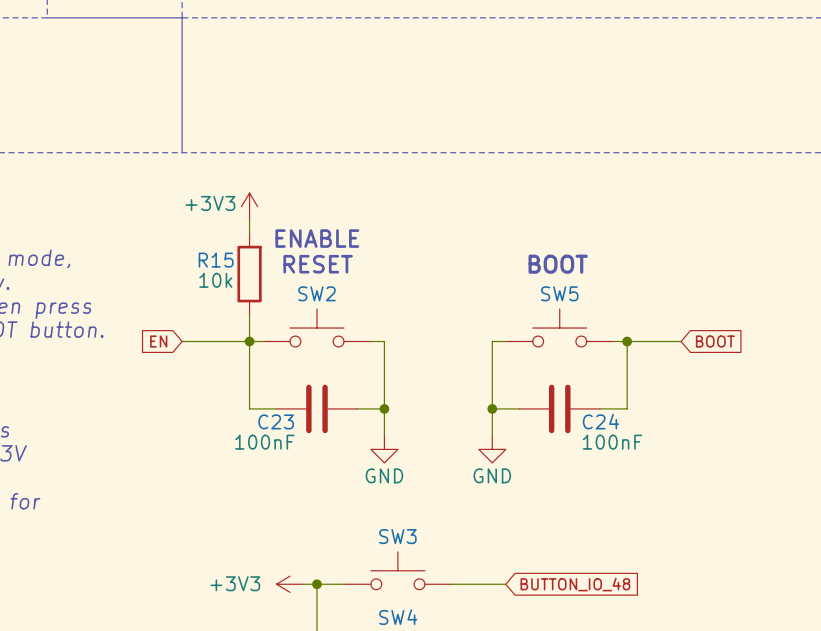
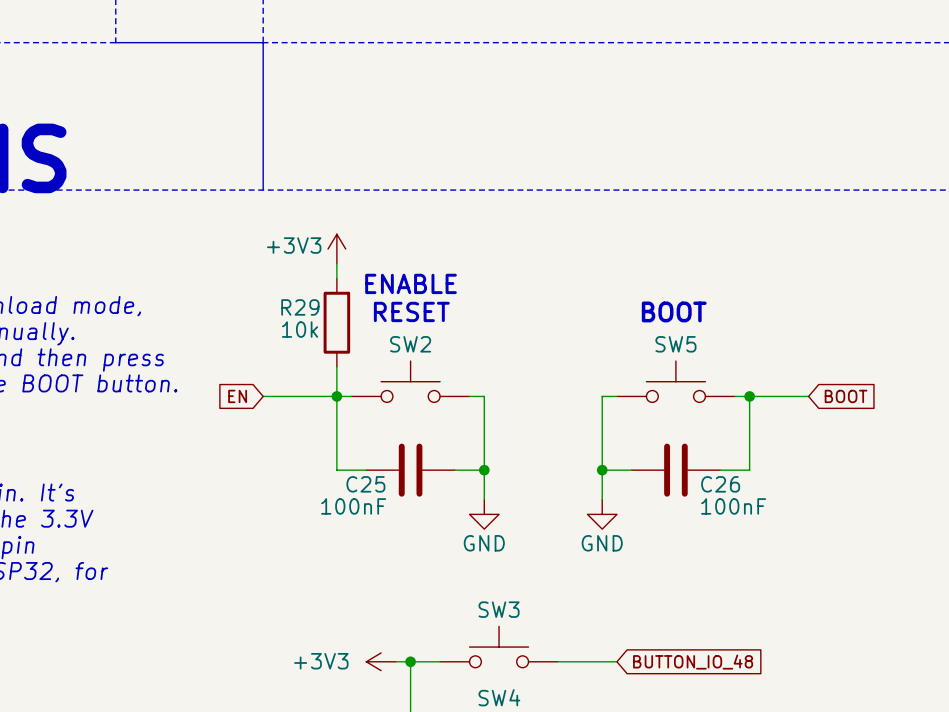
R15 name: R15 (216, 260) -> R29 (300, 307)
C23 name: C23 (276, 421) -> C25 (365, 484)
C24 name: C24 (600, 421) -> C26 (720, 484)

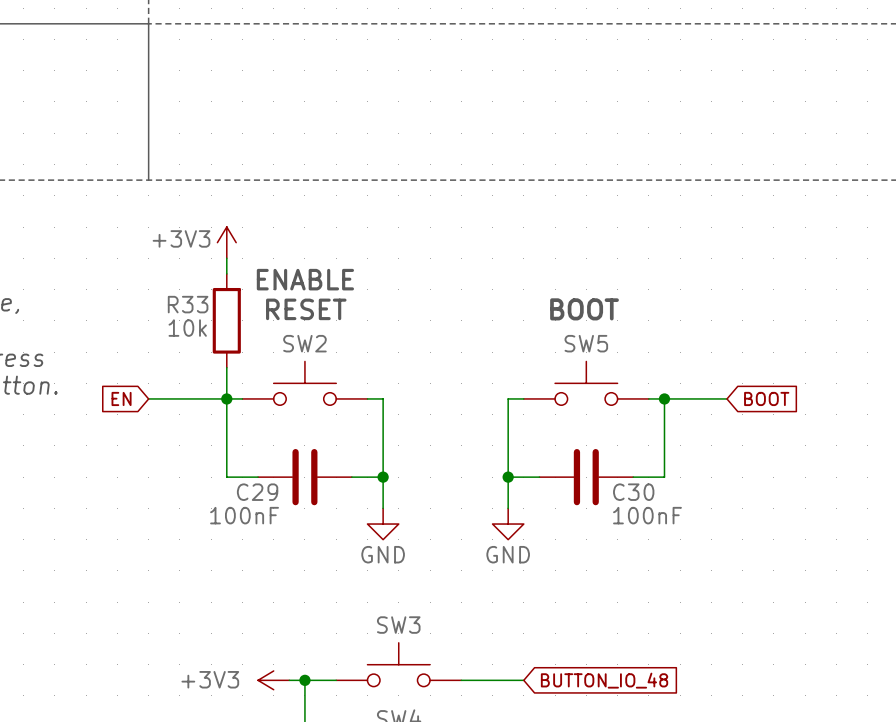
R29 name: R29 (300, 307) -> R33 (188, 304)
C25 name: C25 (365, 484) -> C29 (257, 492)
C26 name: C26 (720, 484) -> C30 (633, 492)

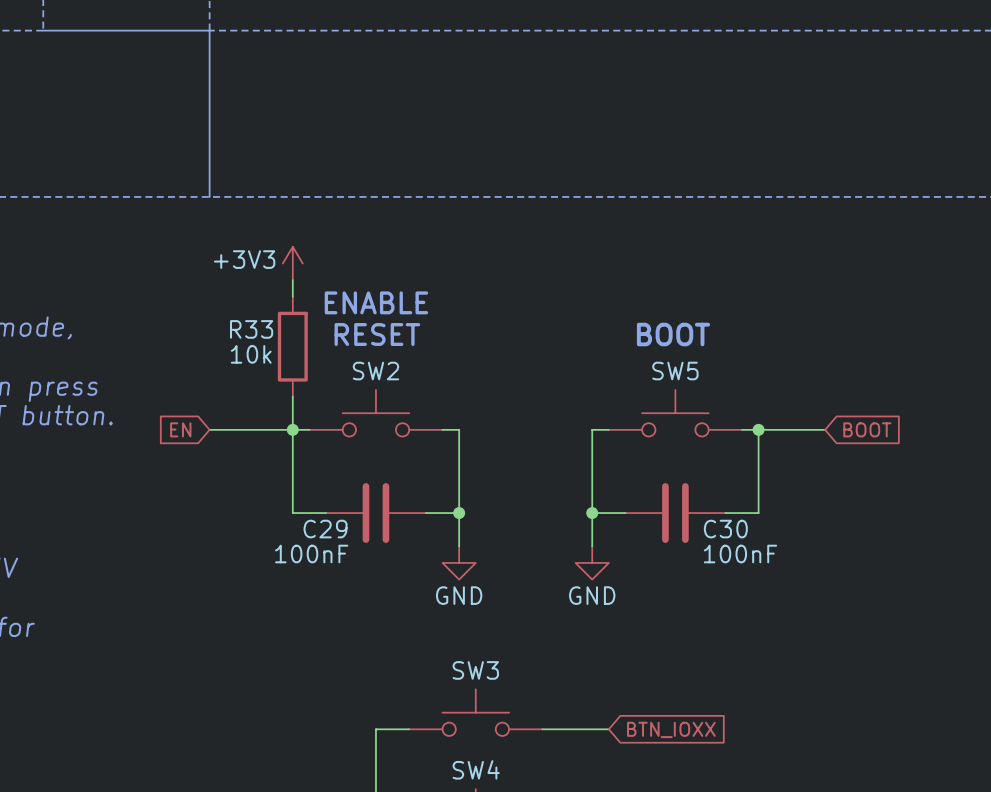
power symbol: +3V3 (273, 680) -> none
wire: (289, 680) (304, 680) -> none
junction: (304, 680) -> none
global label: BUTTON_IO_48 (604, 680) -> BTN_IOXX (671, 729)

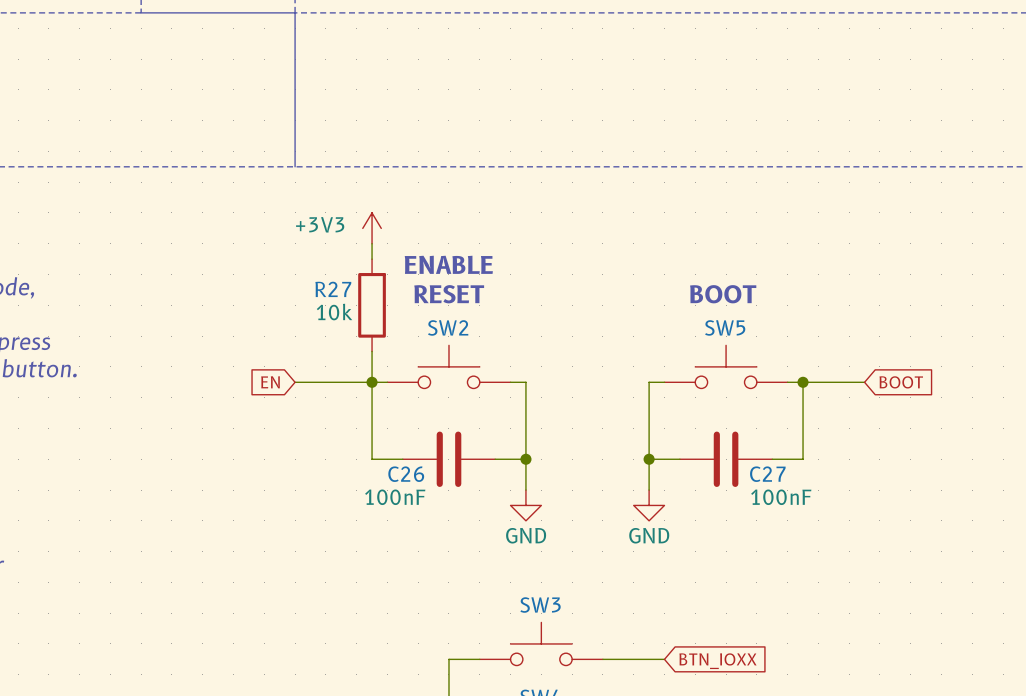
R33 name: R33 (251, 329) -> R27 (333, 289)
C29 name: C29 (325, 529) -> C26 (406, 474)
C30 name: C30 (725, 529) -> C27 (767, 474)

